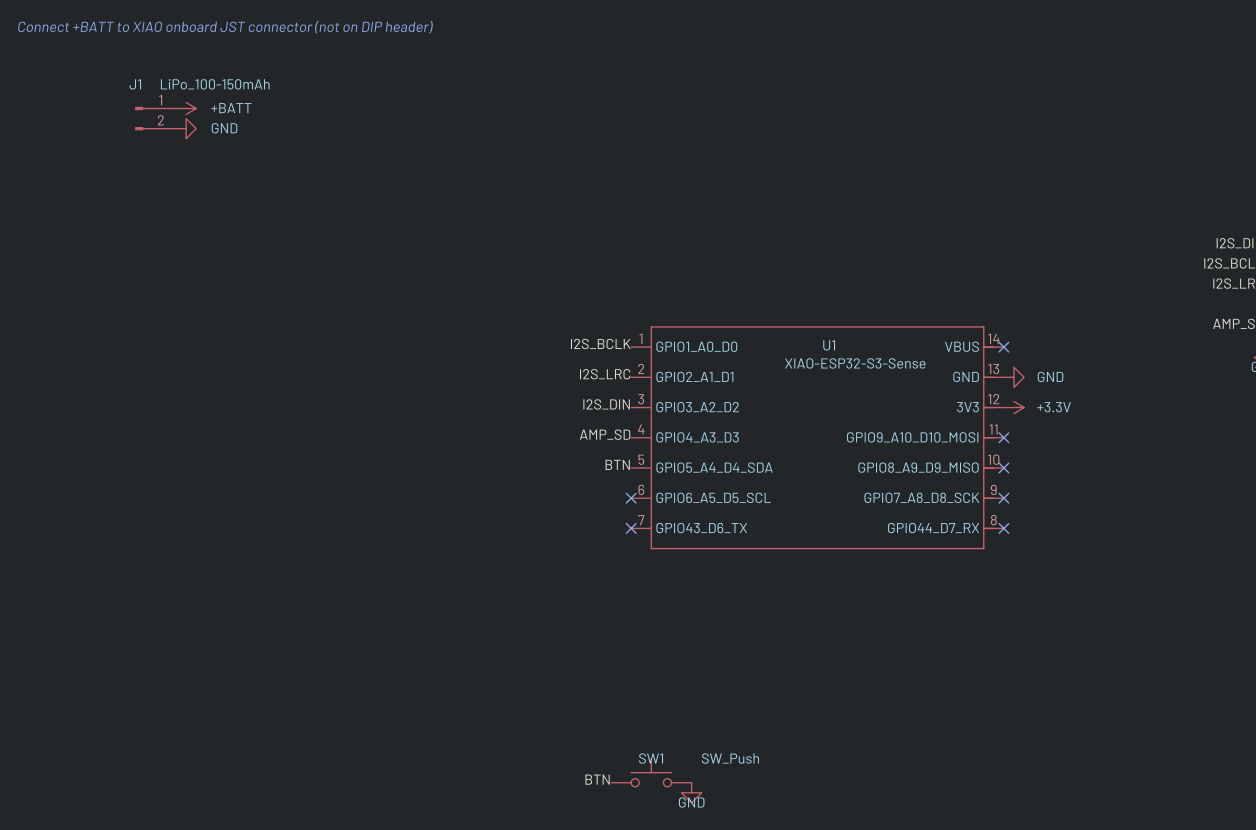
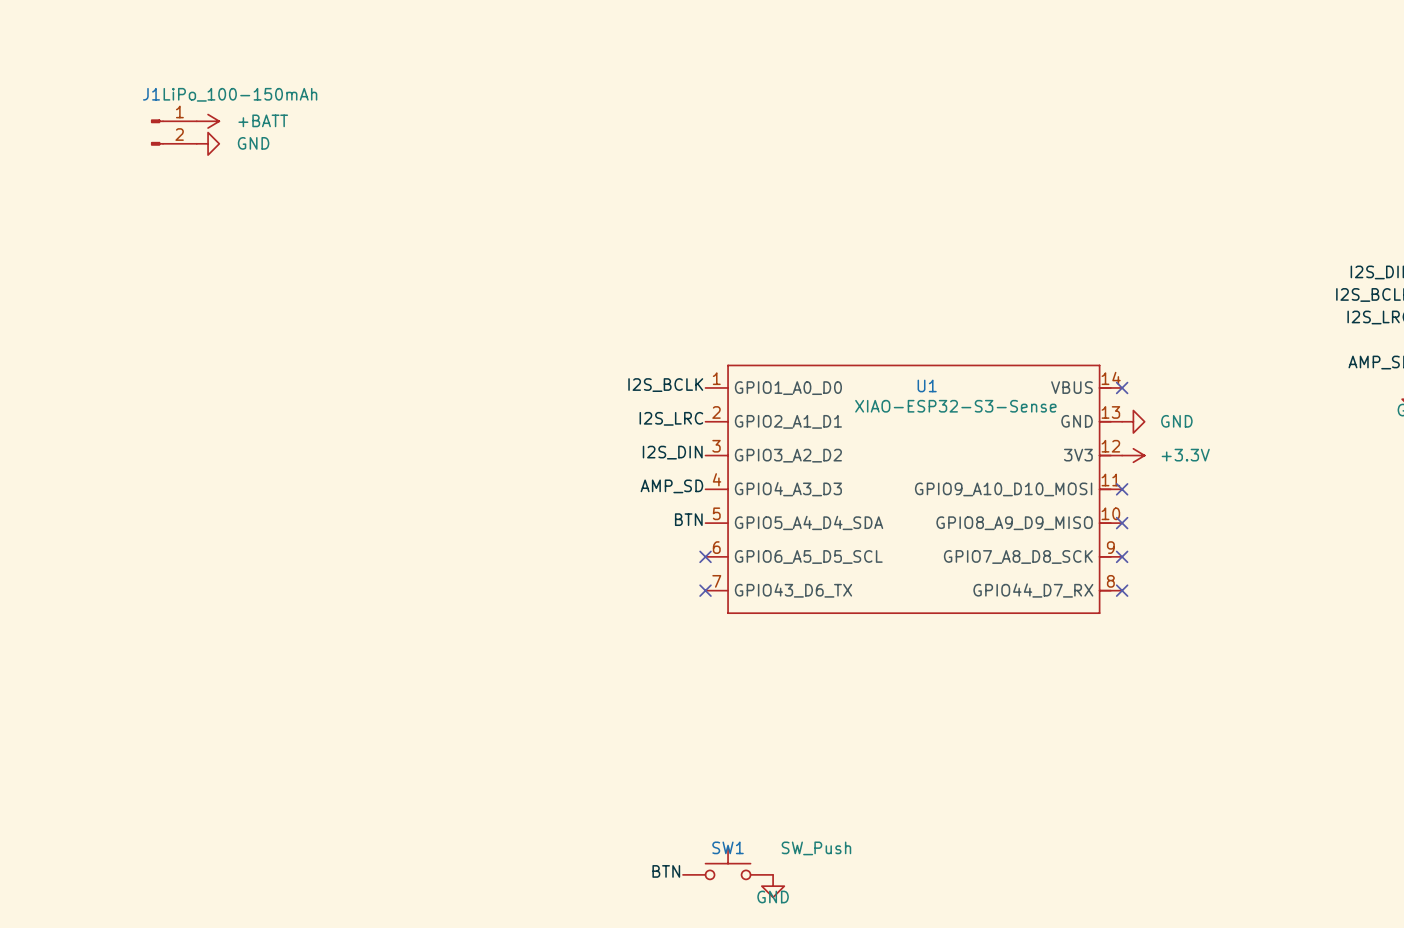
text: Connect +BATT to XIAO onboard JST connector (not on DIP header) (225, 27) -> none

